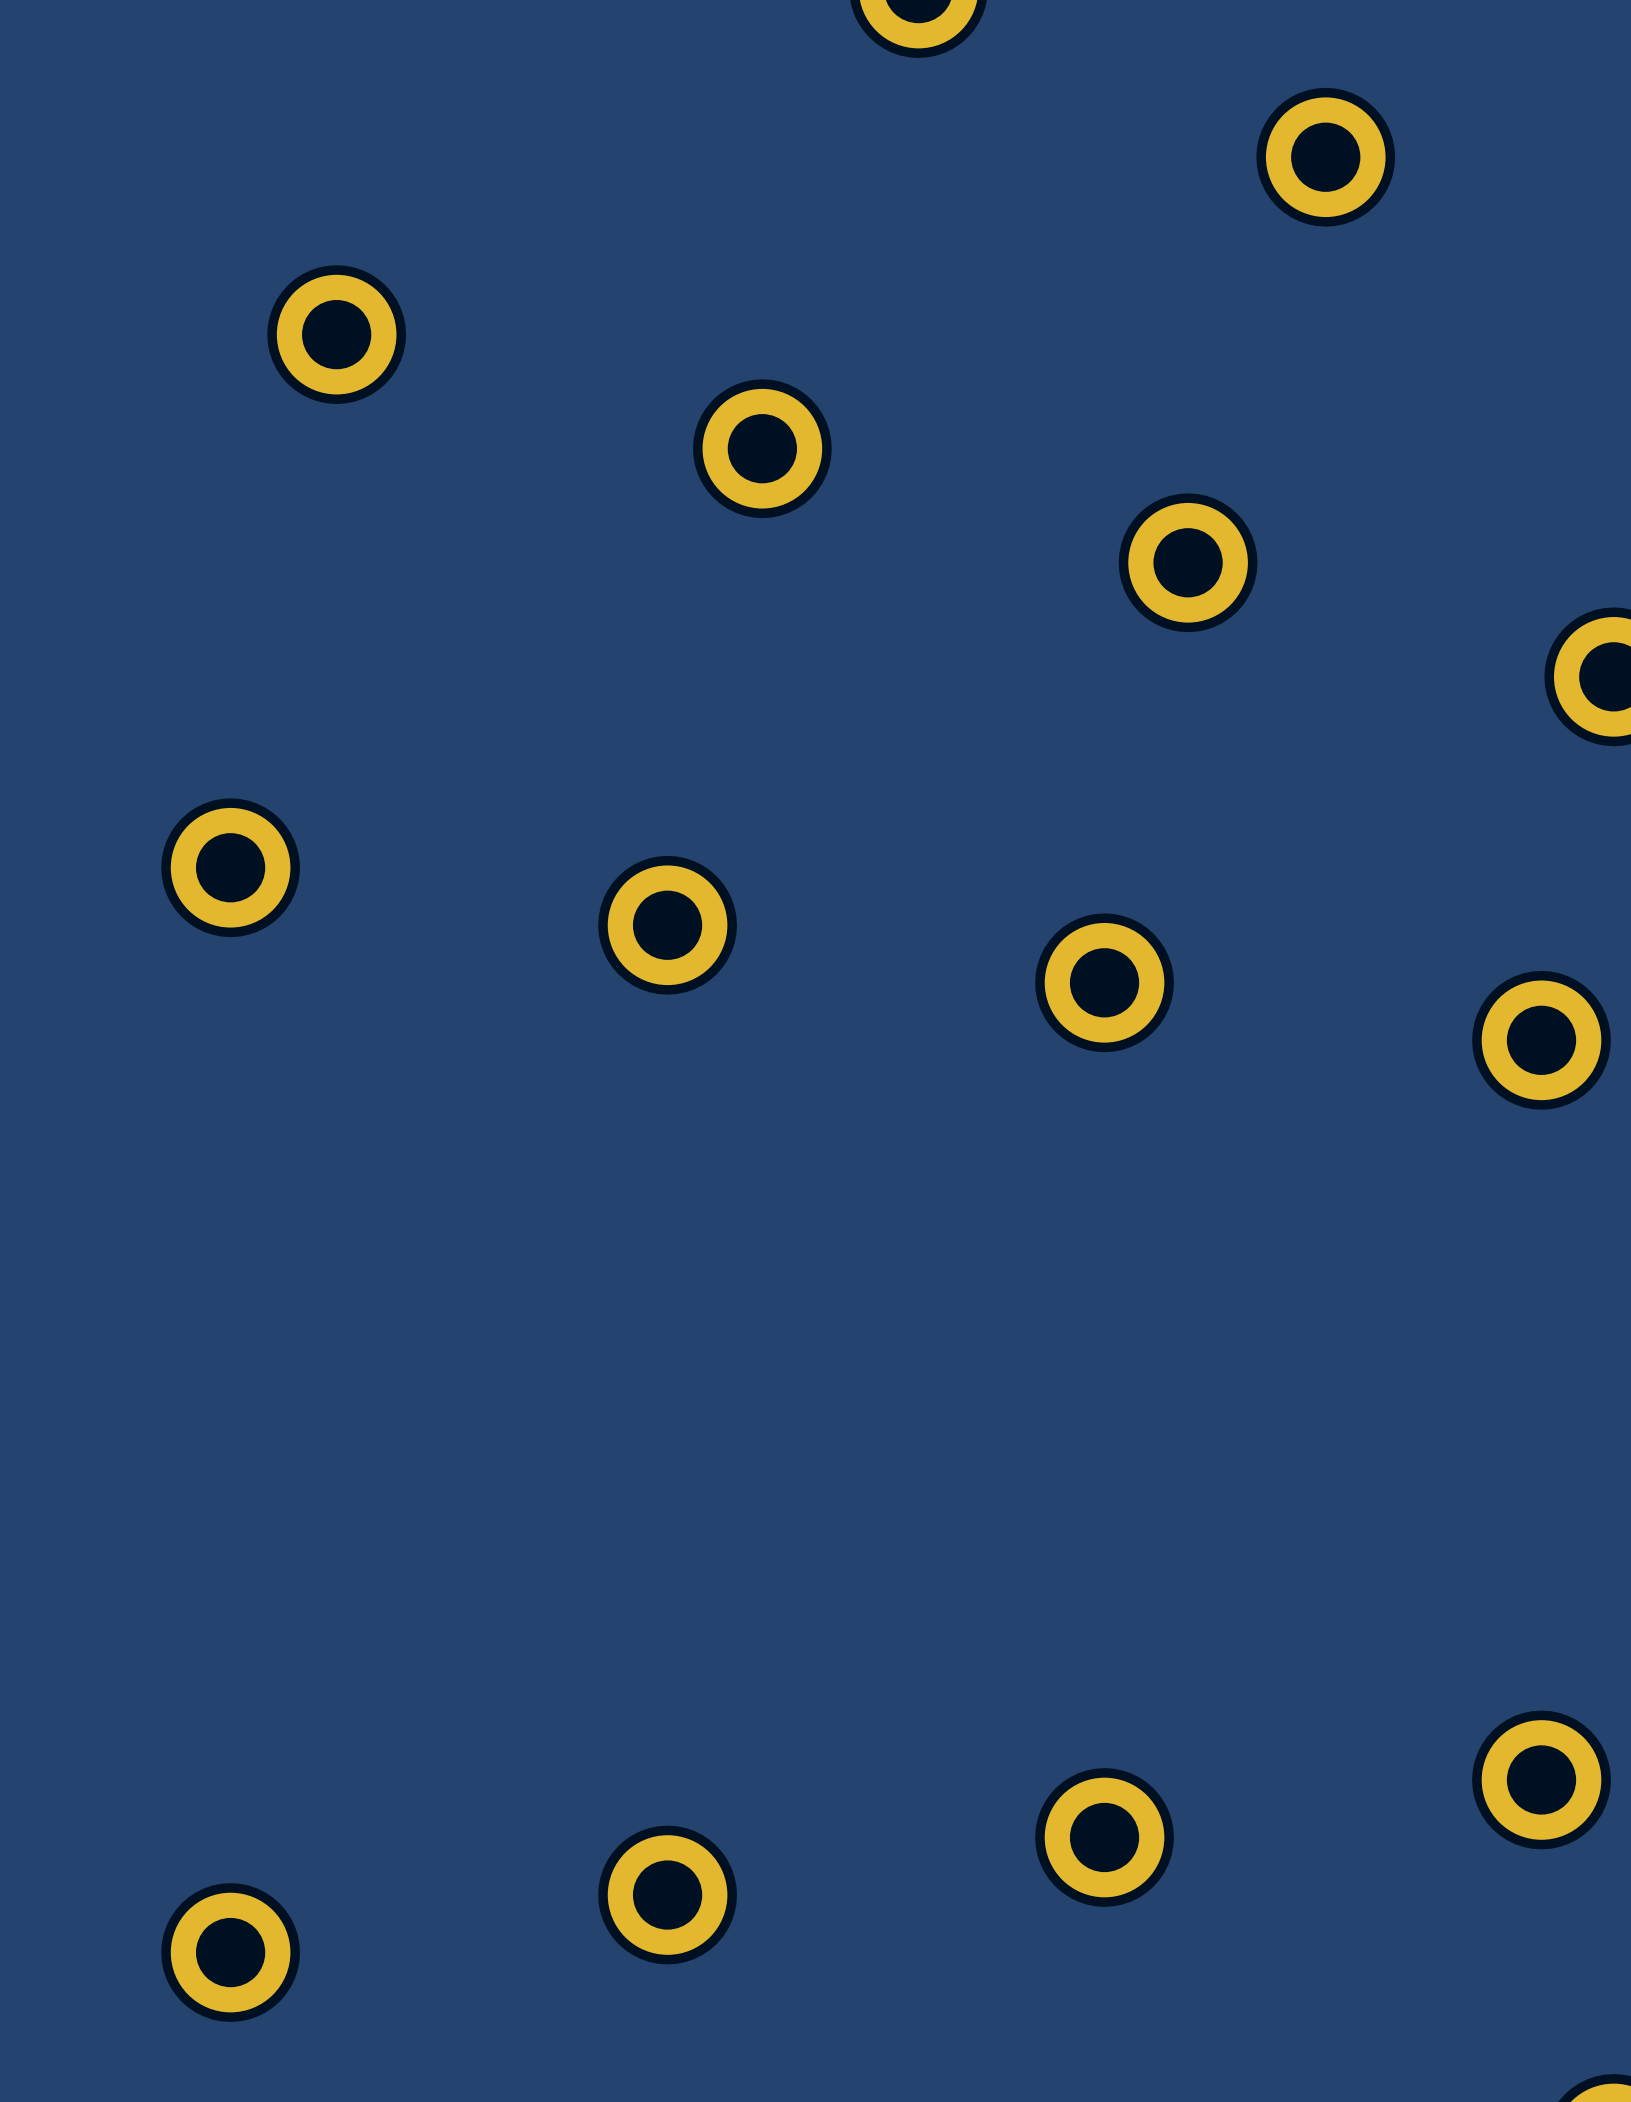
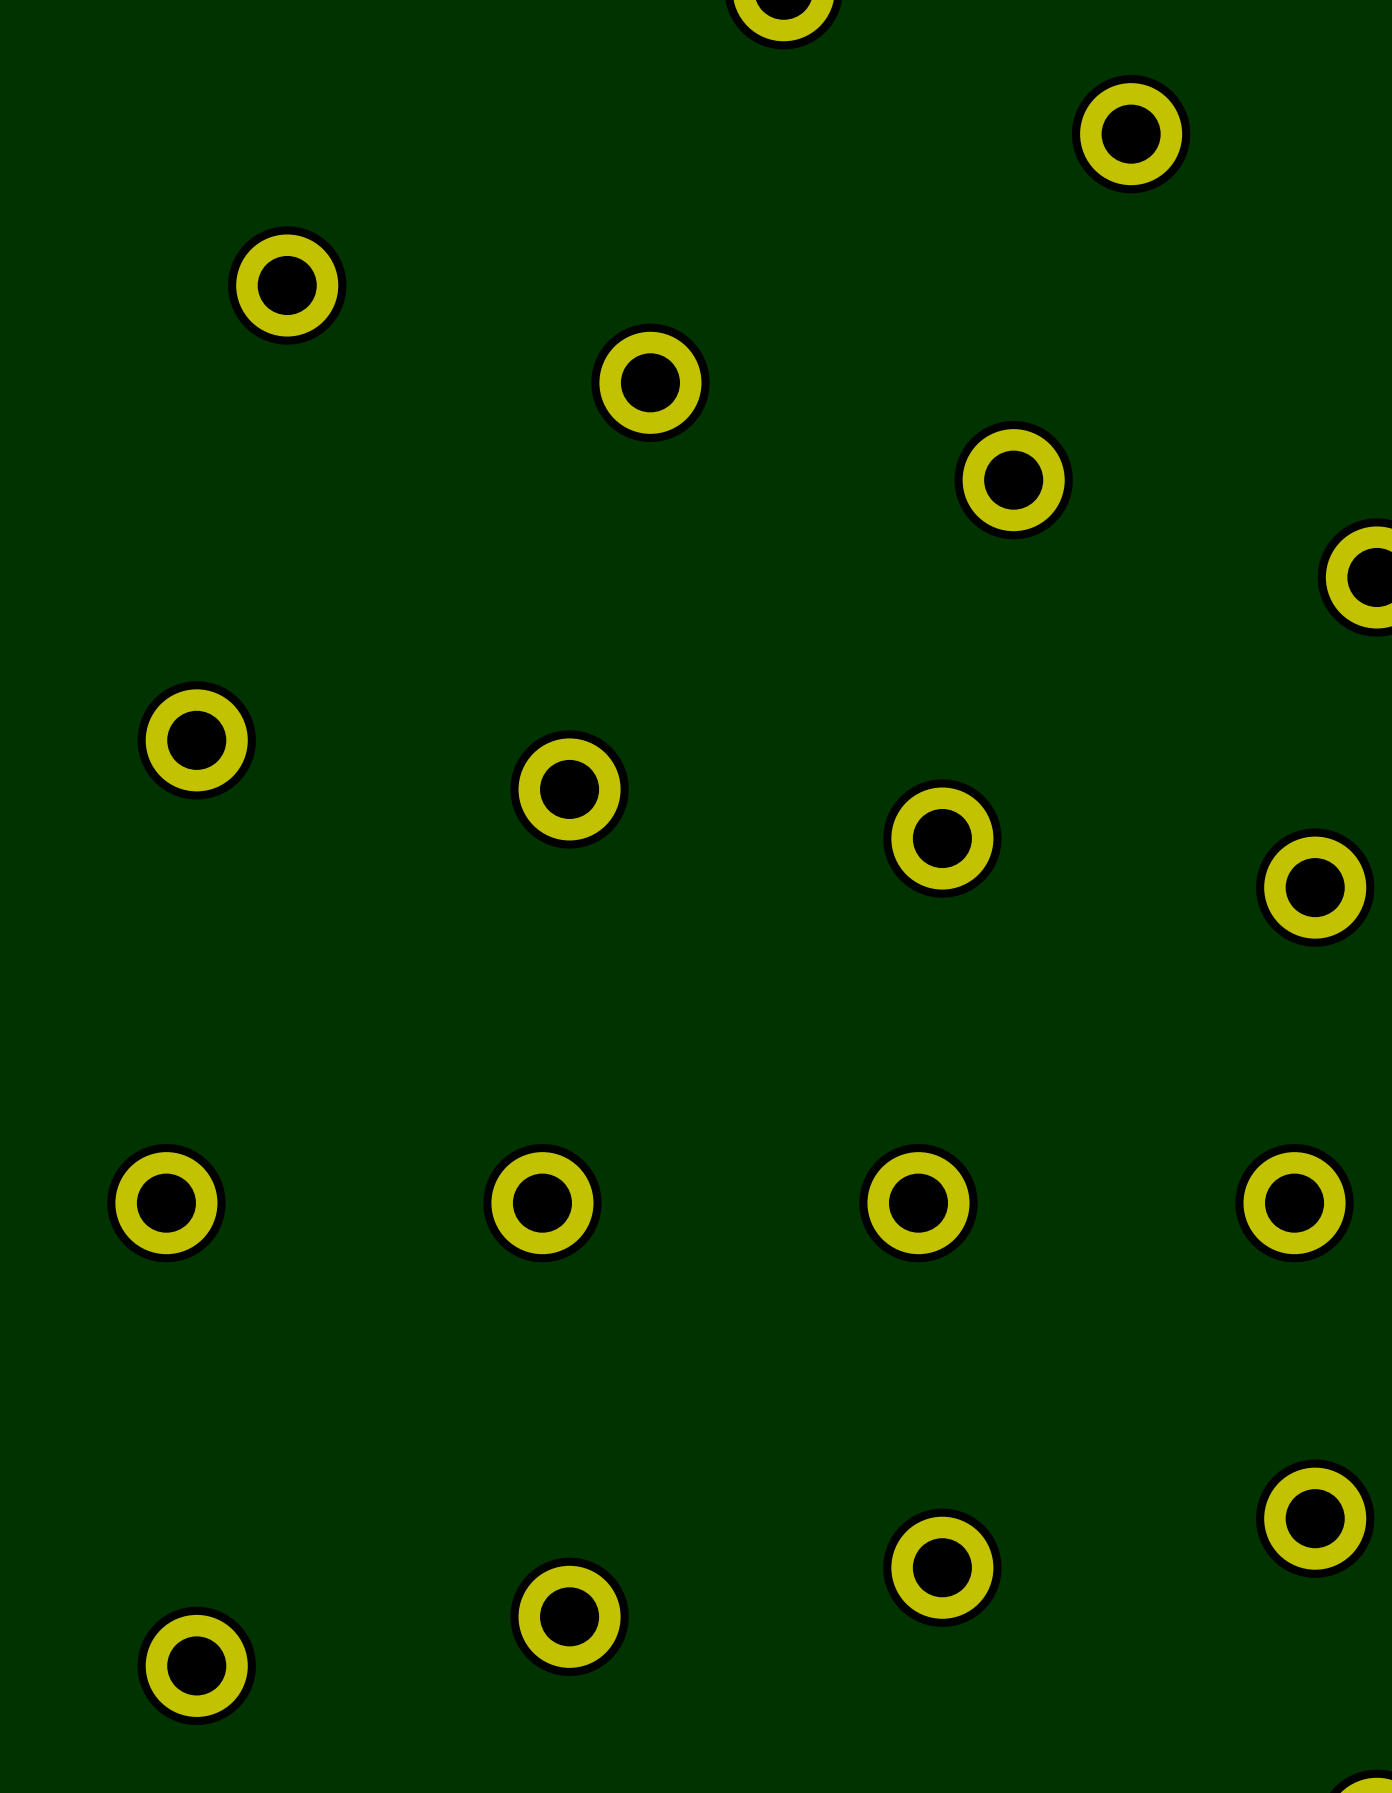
part: none -> (166, 1203)
part: none -> (542, 1203)
part: none -> (918, 1203)
part: none -> (1294, 1203)

